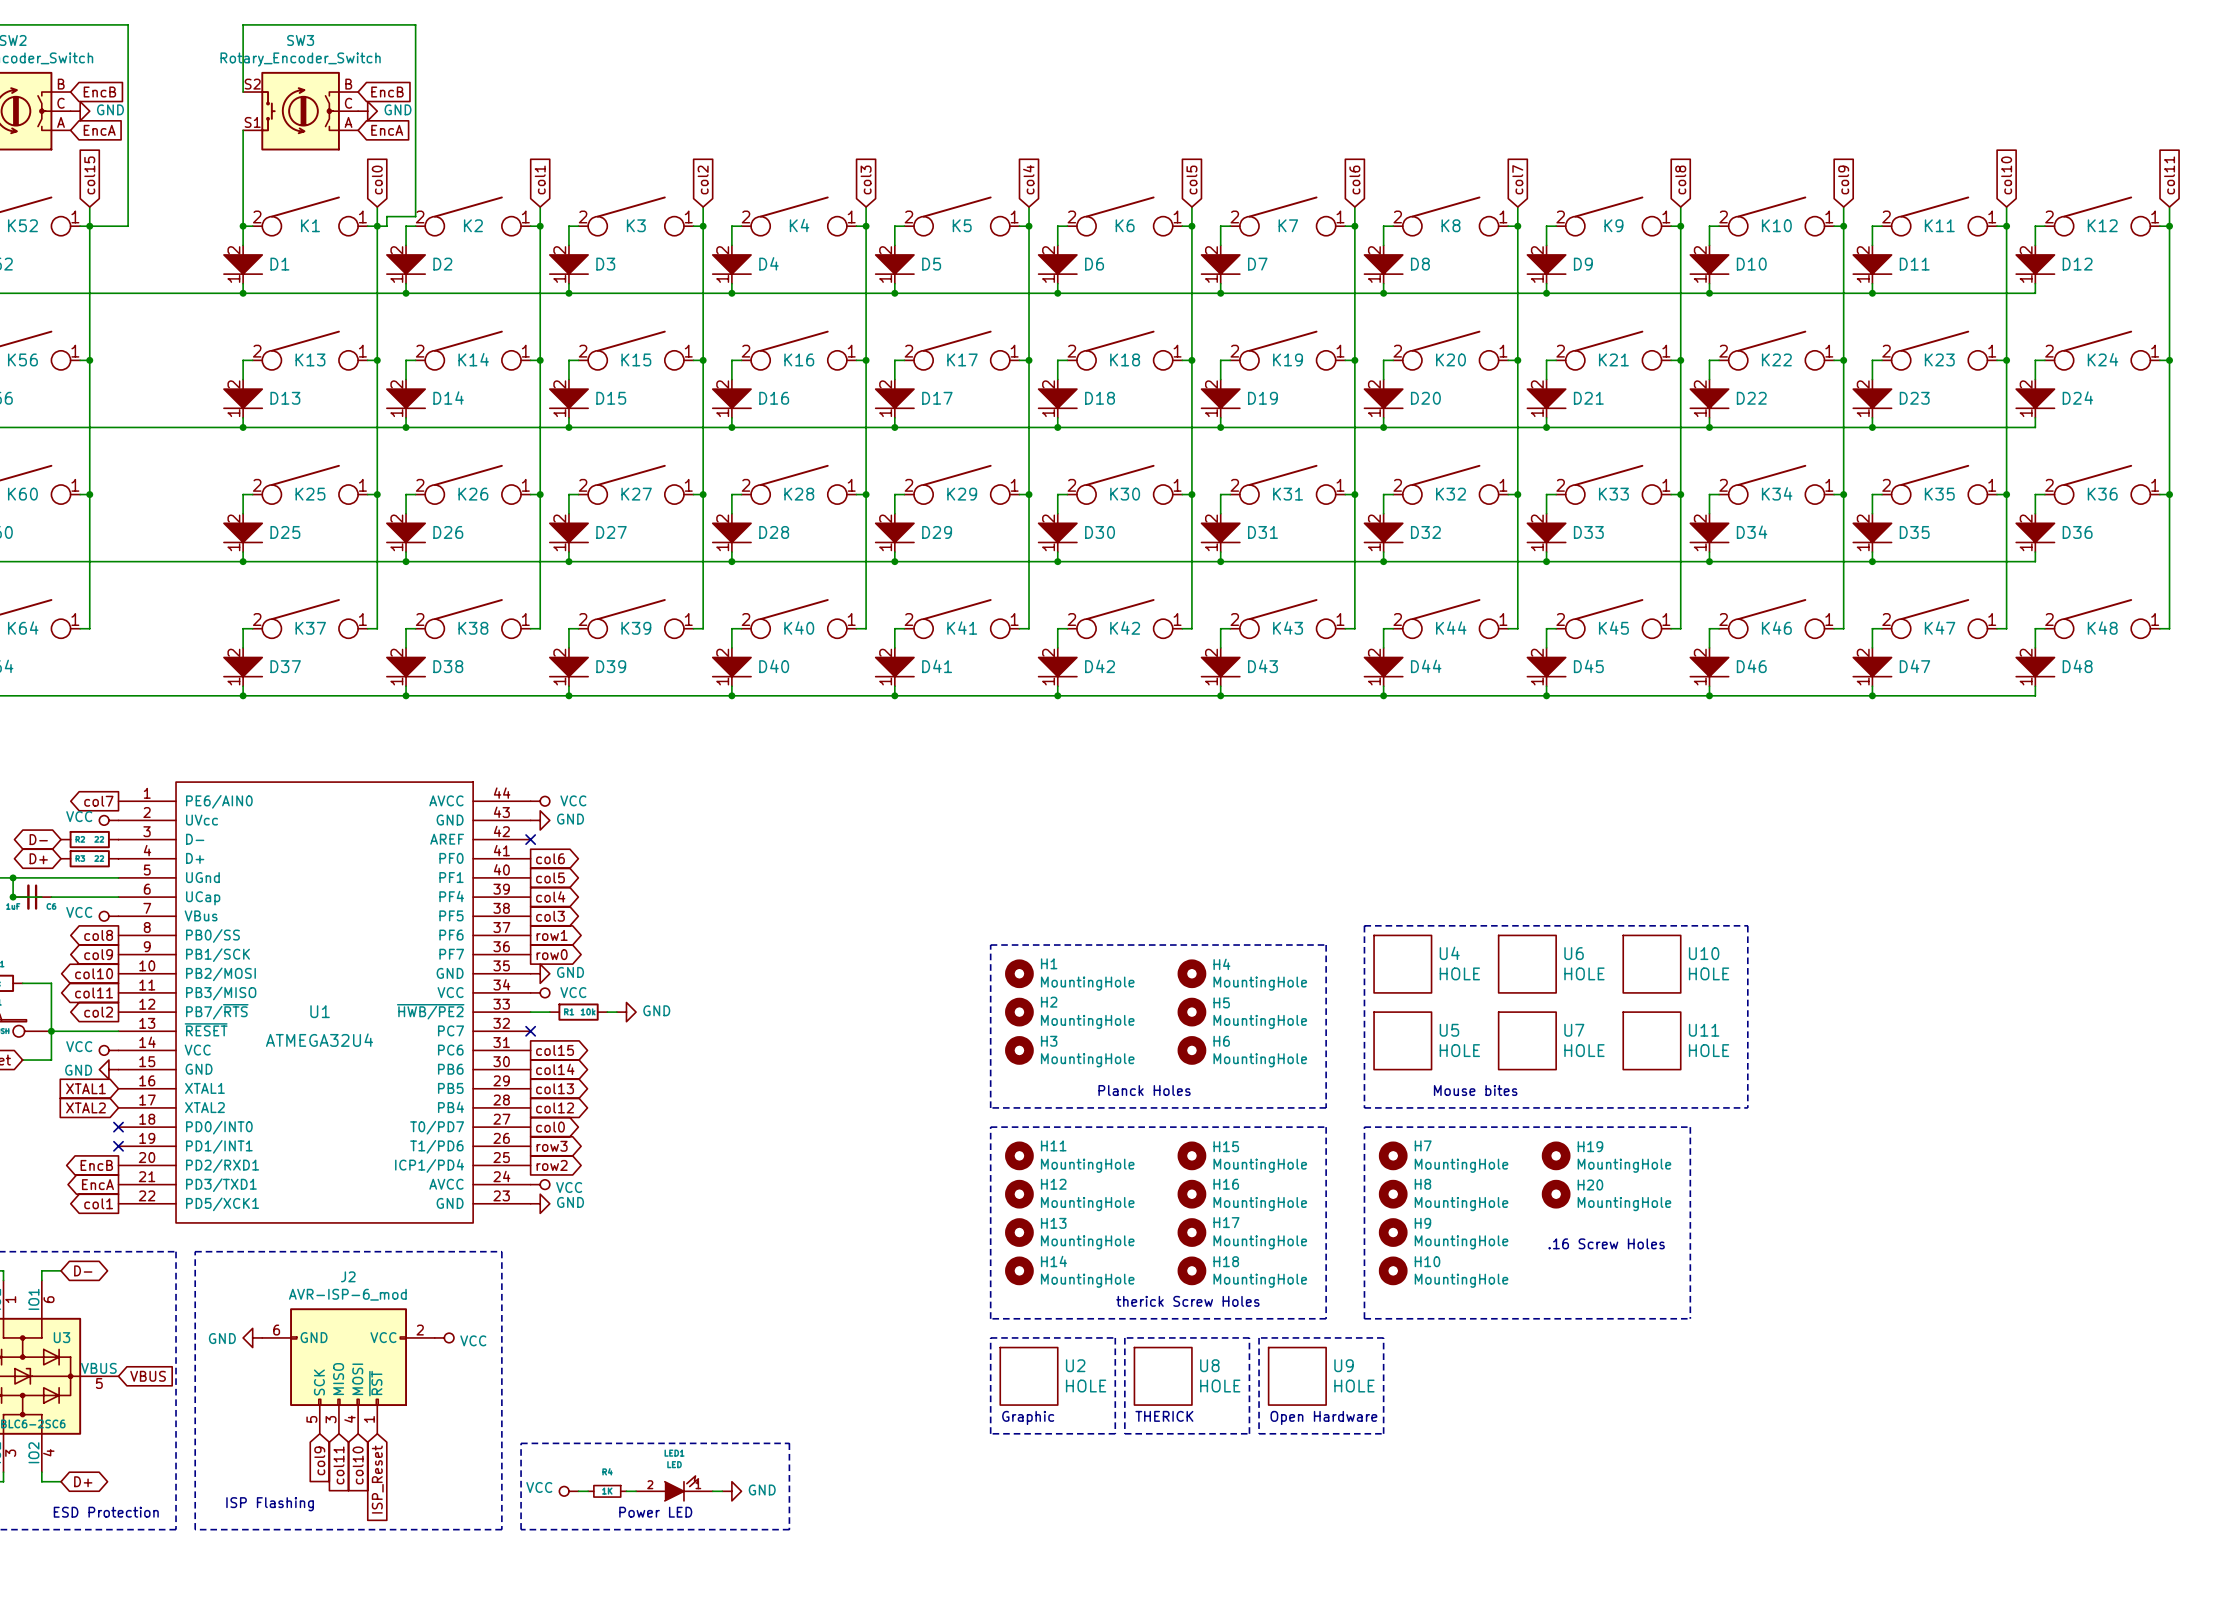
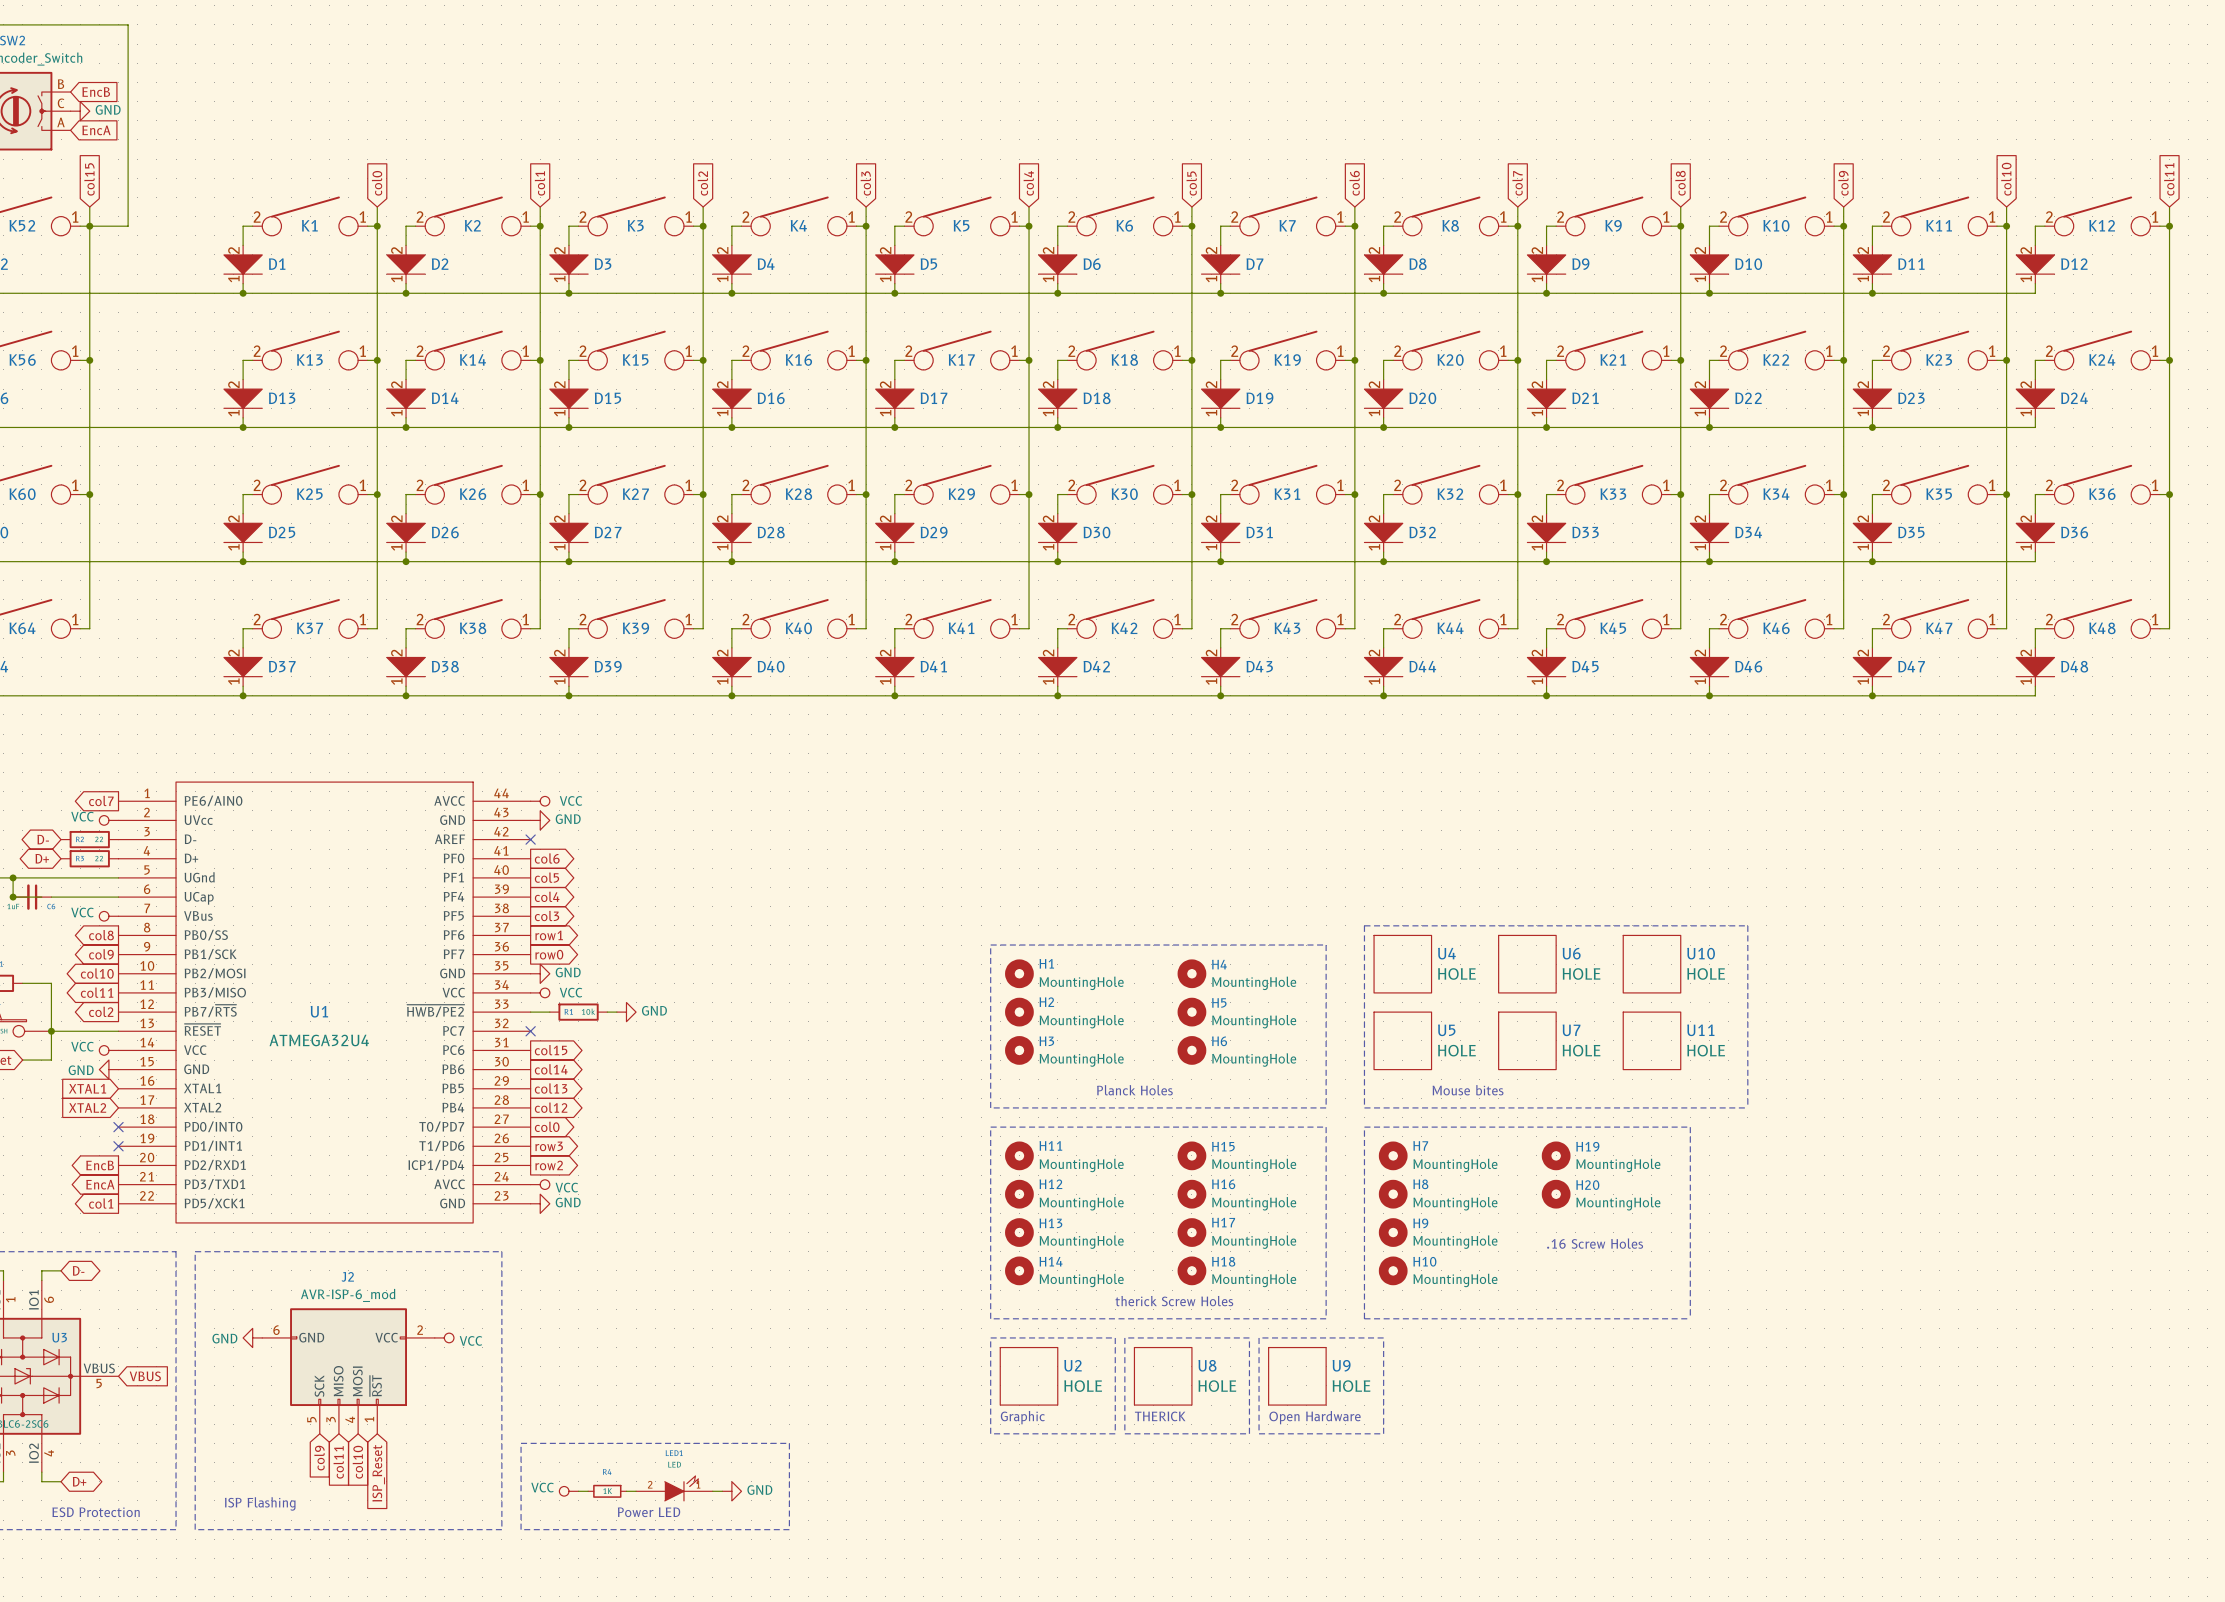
wire: (243, 92) (243, 24) (415, 24) (415, 216) (386, 216) (386, 226) (377, 226) -> none
global label: EncB (387, 92) -> none
SW3: Rotary_Encoder_Switch (300, 111) -> none
power symbol: GND (367, 111) -> none
wire: (243, 130) (243, 226) -> none
global label: EncA (387, 130) -> none
junction: (243, 226) -> none

